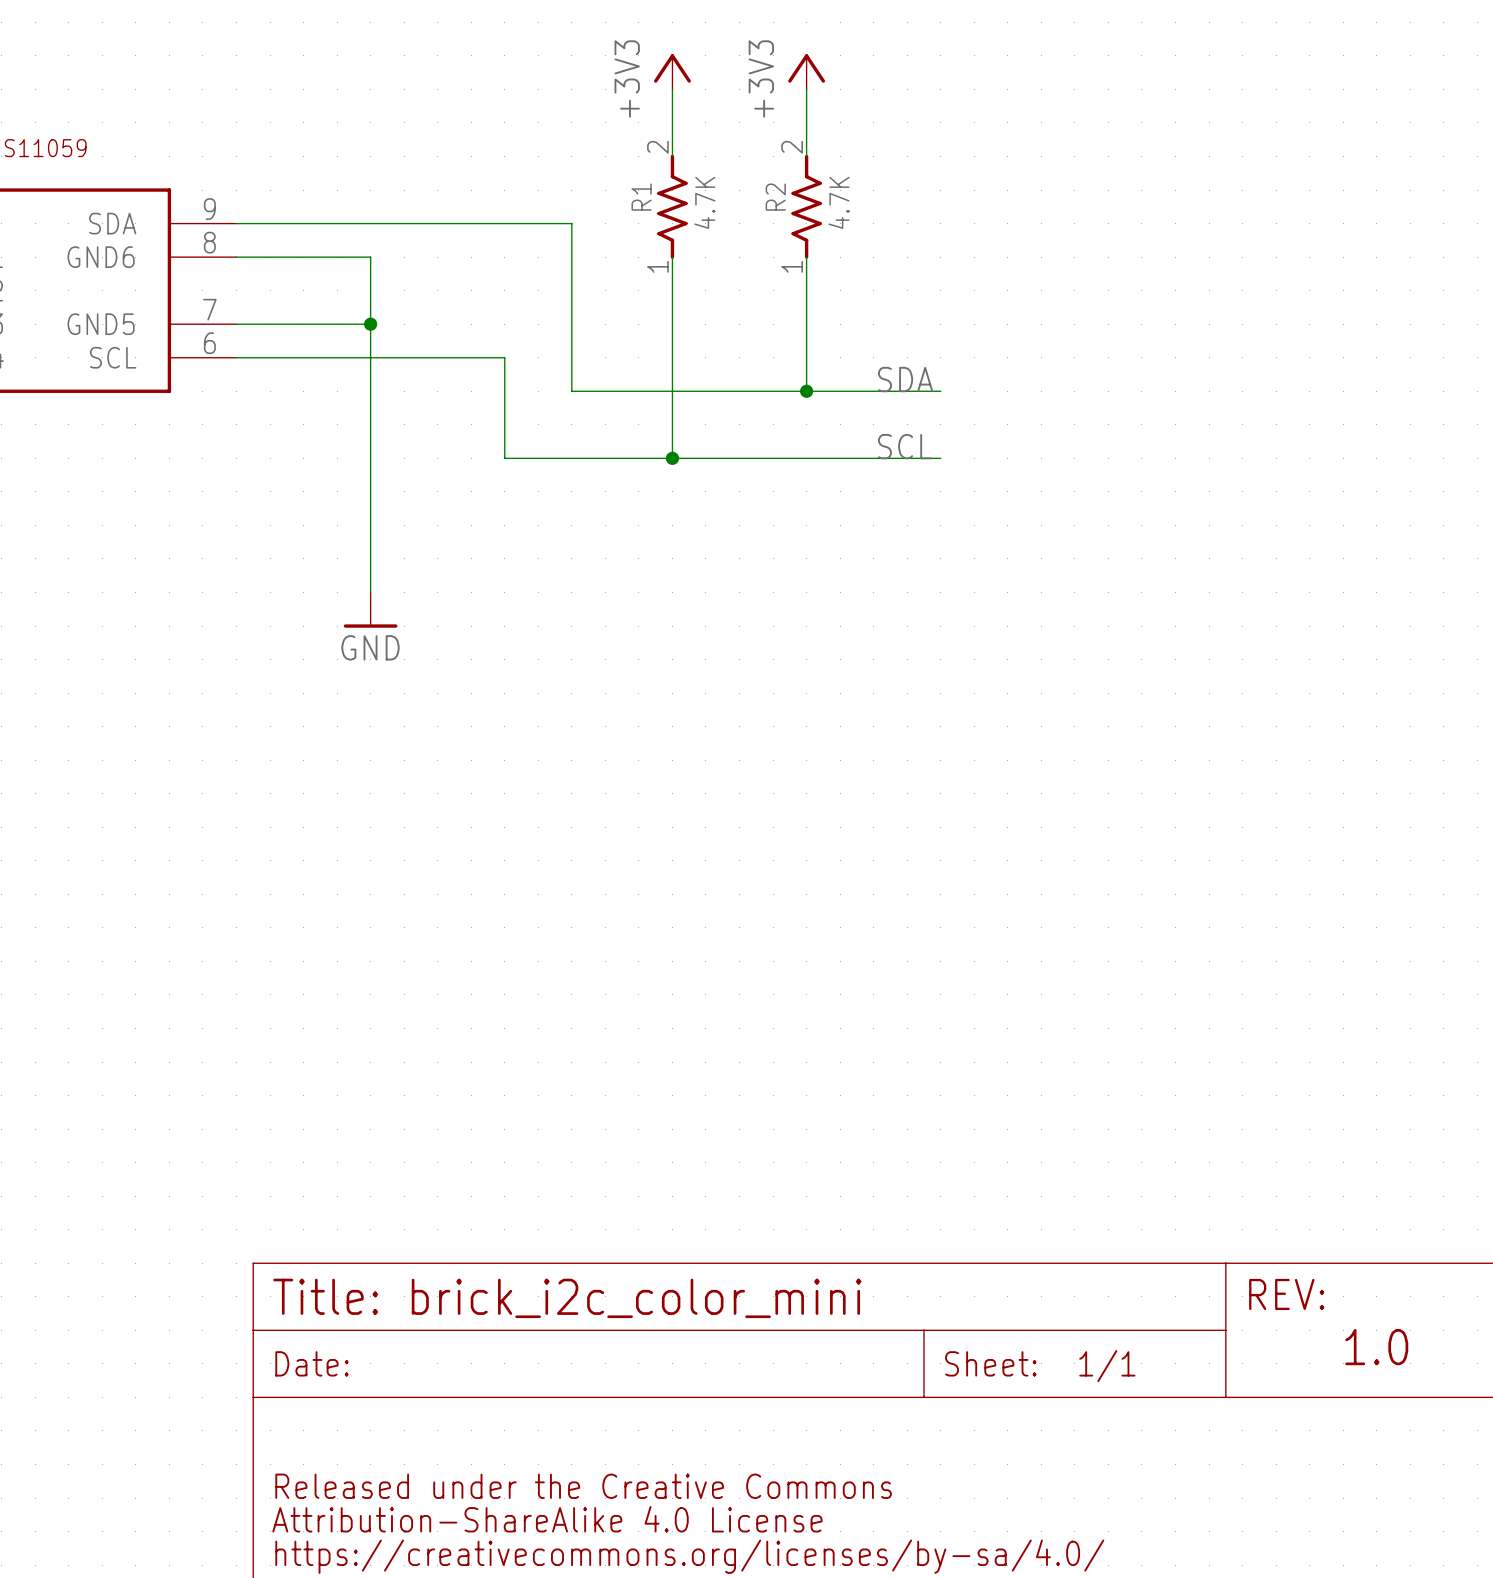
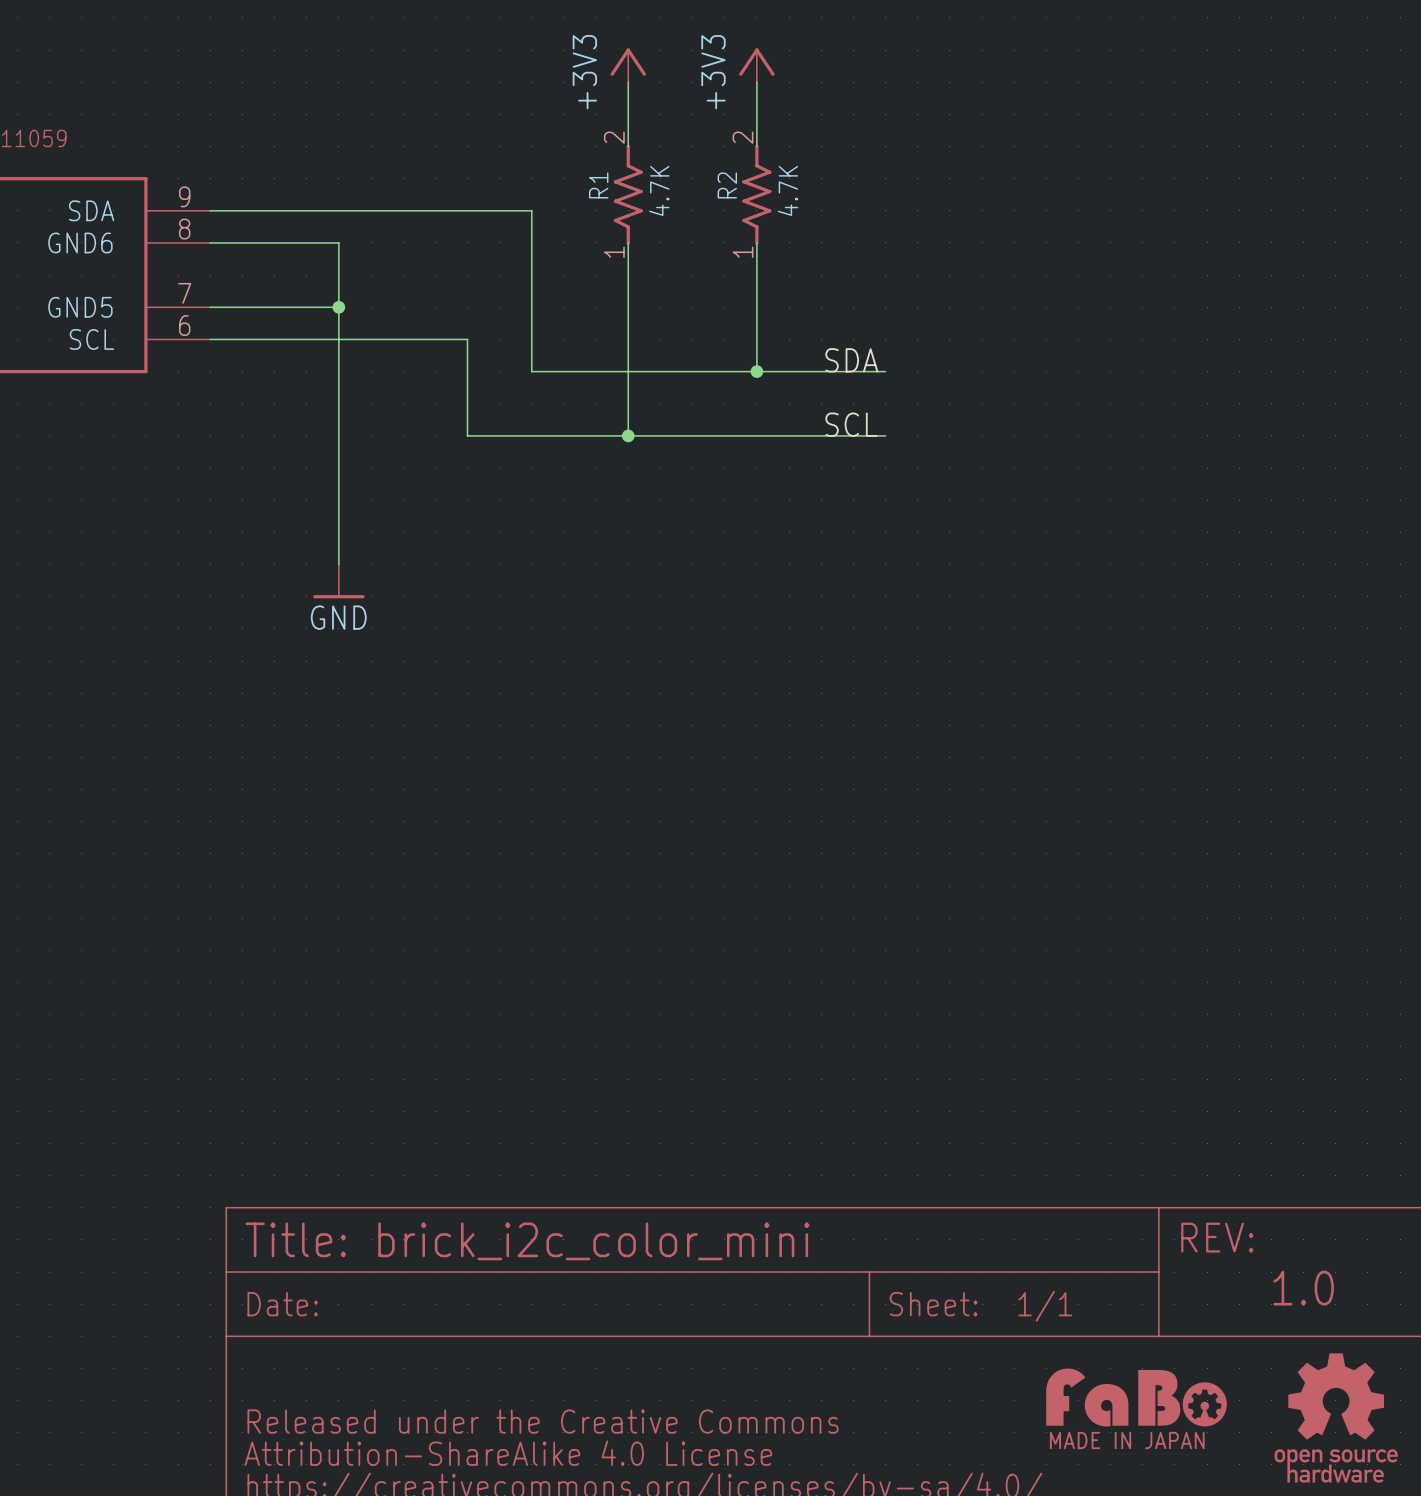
part: none -> (1136, 1397)
part: none -> (1336, 1418)

